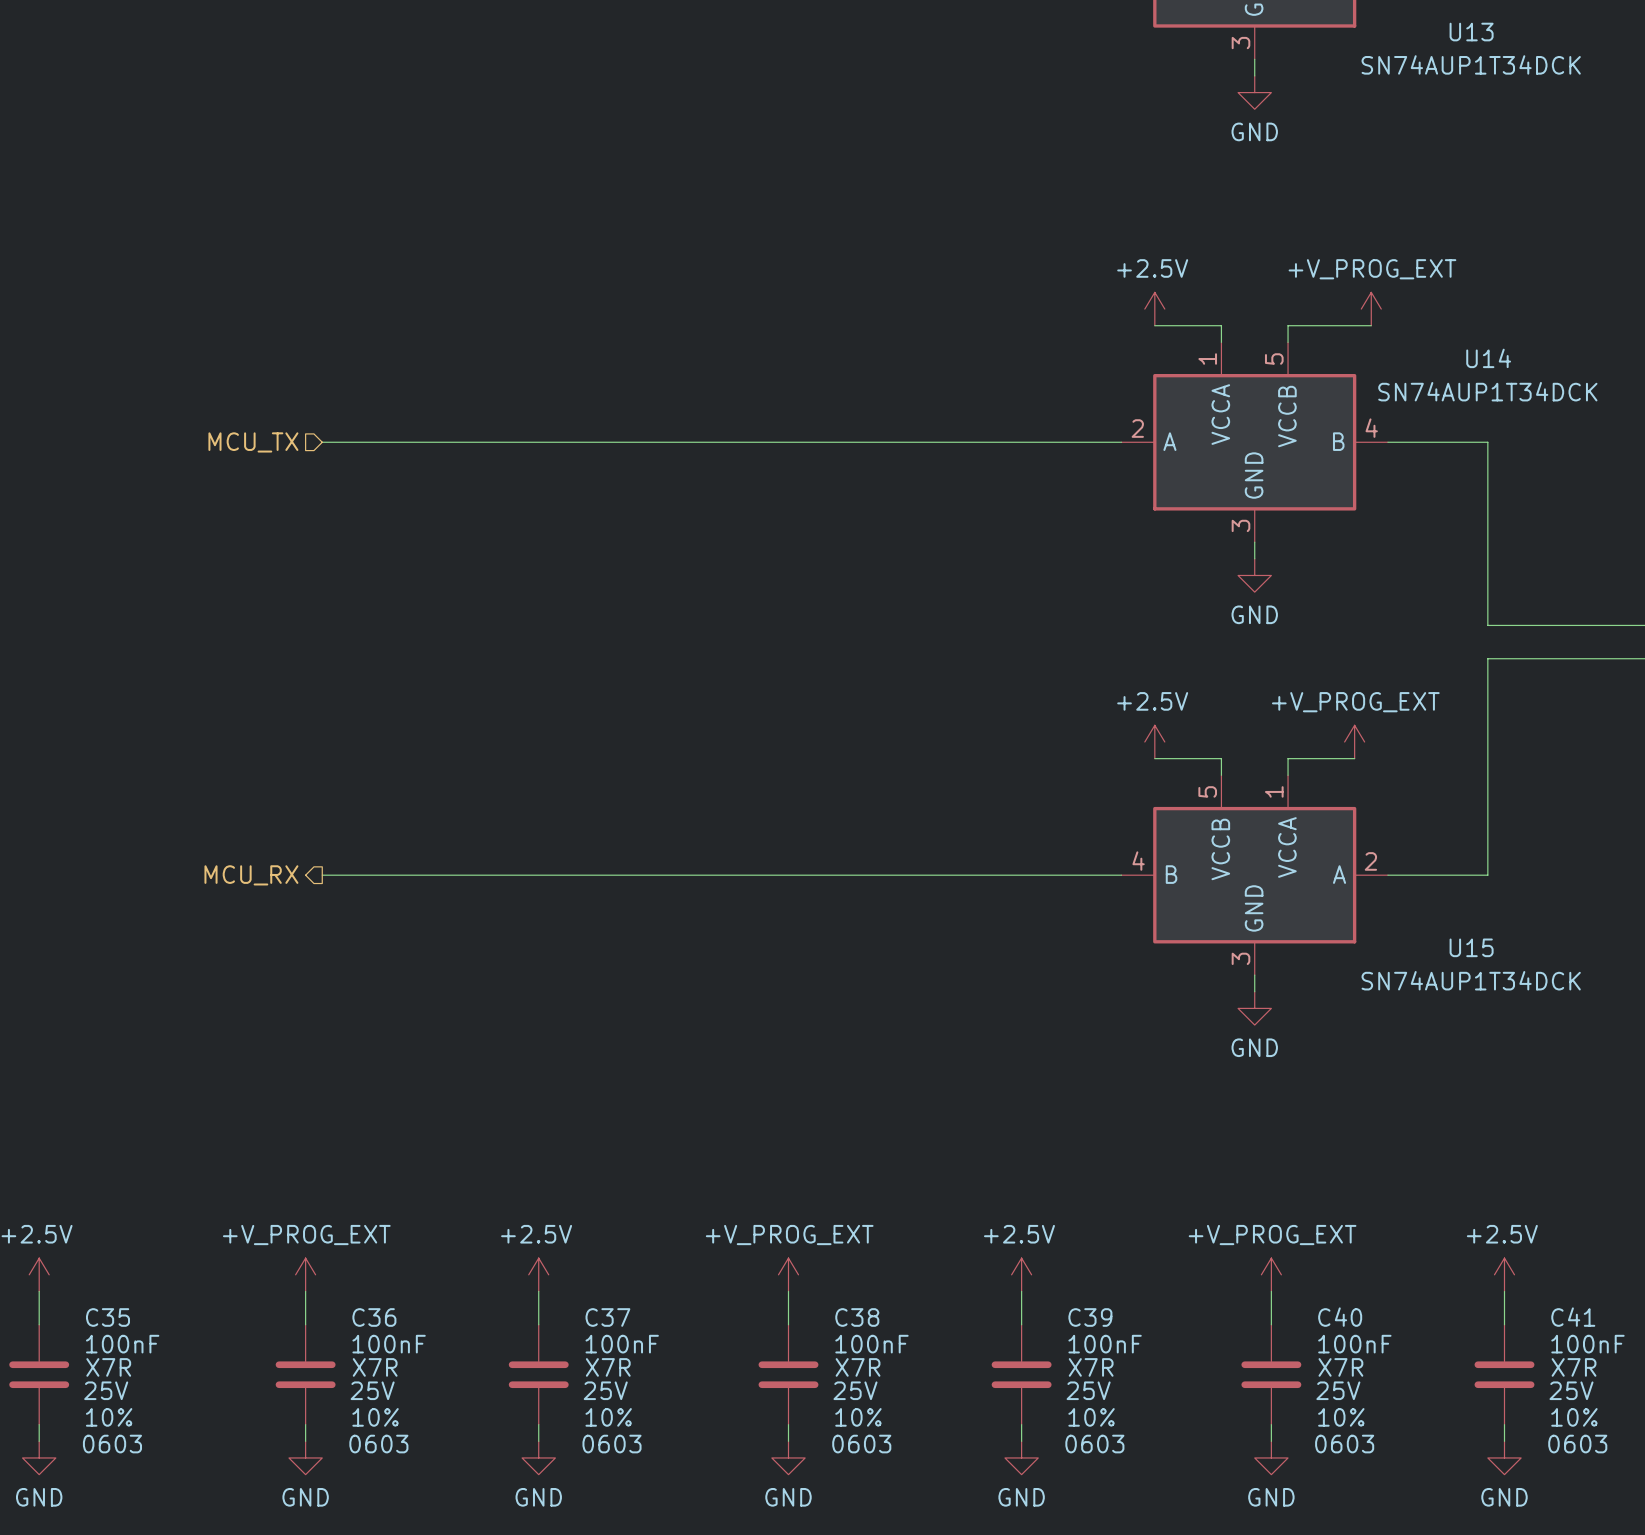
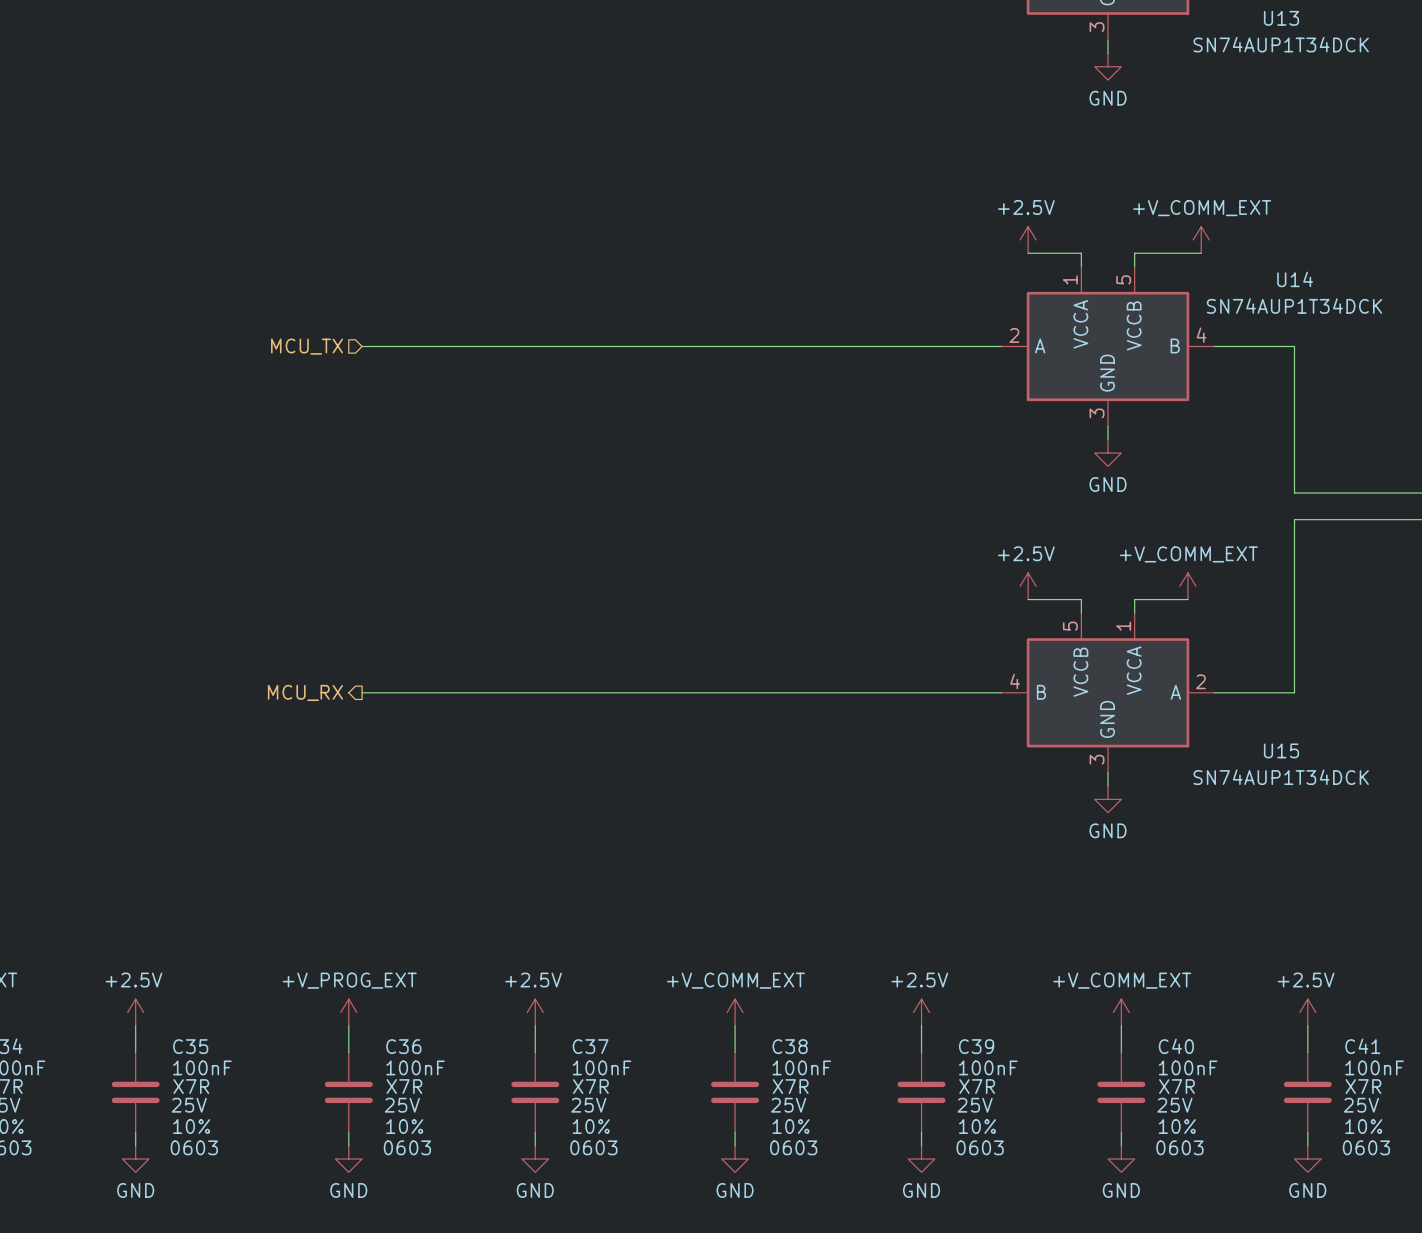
power symbol: +V_PROG_EXT (1371, 309) -> +V_COMM_EXT (1201, 239)
power symbol: +V_PROG_EXT (1354, 741) -> +V_COMM_EXT (1187, 586)
power symbol: +V_PROG_EXT (788, 1274) -> +V_COMM_EXT (735, 1012)
power symbol: +V_PROG_EXT (1271, 1274) -> +V_COMM_EXT (1121, 1012)

